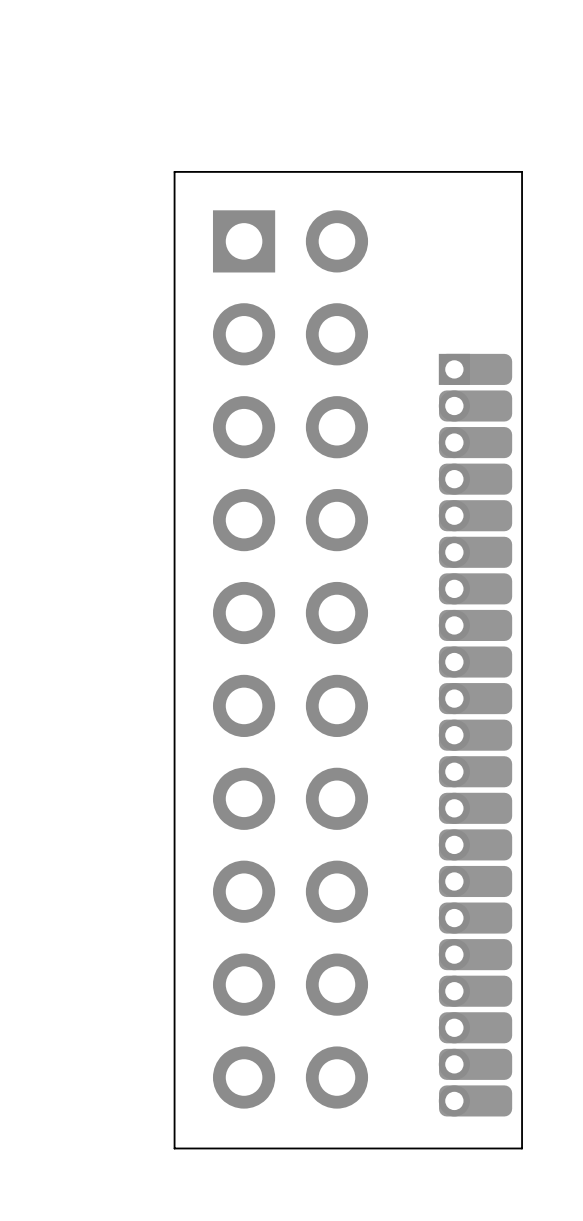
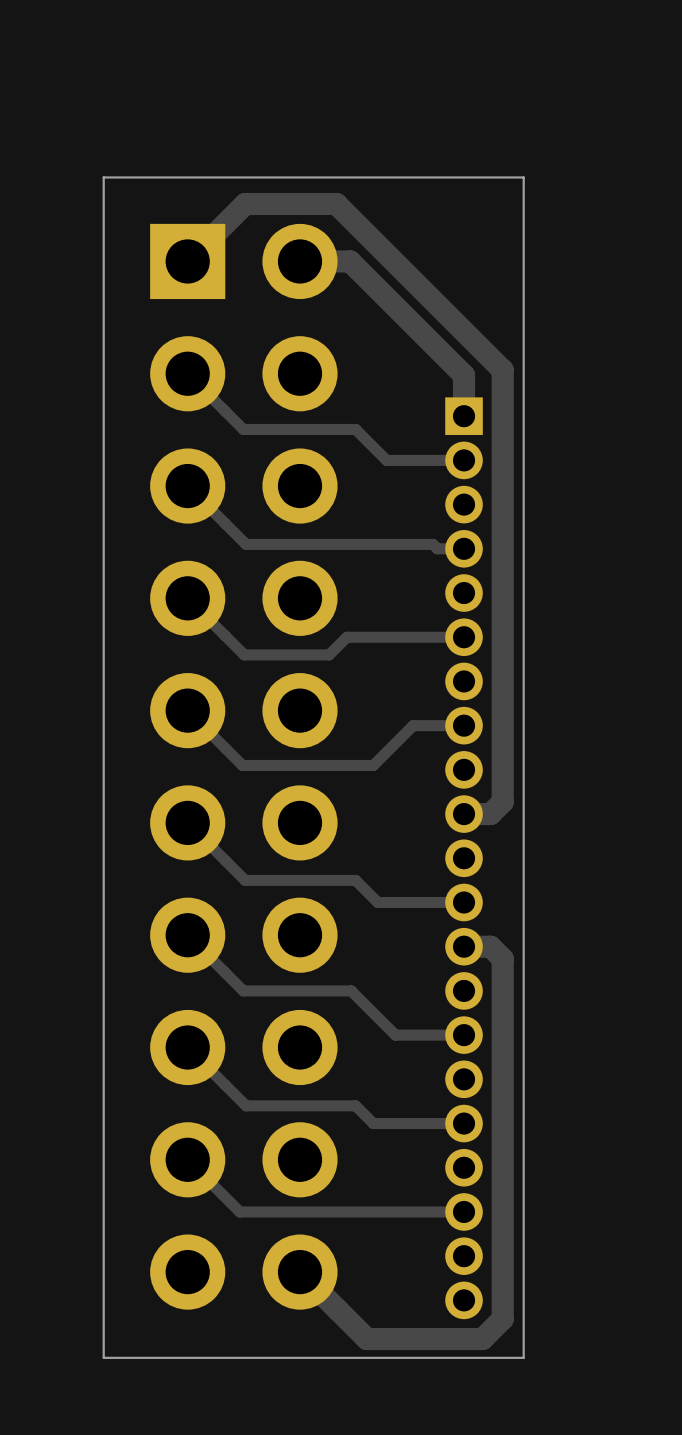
track: none -> (187, 261) (245, 203) (336, 203) (502, 370) (502, 801) (490, 814) (464, 814)
track: none -> (300, 261) (350, 261) (464, 375) (464, 416)
track: none -> (187, 373) (243, 429) (355, 429) (386, 460) (464, 460)
part footprint: [438, 353, 513, 1117] -> [445, 397, 483, 1320]
track: none -> (187, 486) (246, 544) (433, 544) (437, 548) (464, 548)
track: none -> (187, 598) (244, 654) (329, 654) (346, 637) (464, 637)
track: none -> (187, 710) (242, 765) (373, 765) (413, 725) (464, 725)
track: none -> (187, 822) (245, 880) (355, 880) (377, 902) (464, 902)
track: none -> (187, 935) (243, 990) (351, 990) (395, 1035) (464, 1035)
track: none -> (464, 946) (490, 946) (502, 958) (502, 1318) (482, 1339) (366, 1339) (300, 1272)
track: none -> (187, 1047) (246, 1105) (355, 1105) (373, 1123) (464, 1123)
track: none -> (187, 1159) (239, 1211) (464, 1211)

